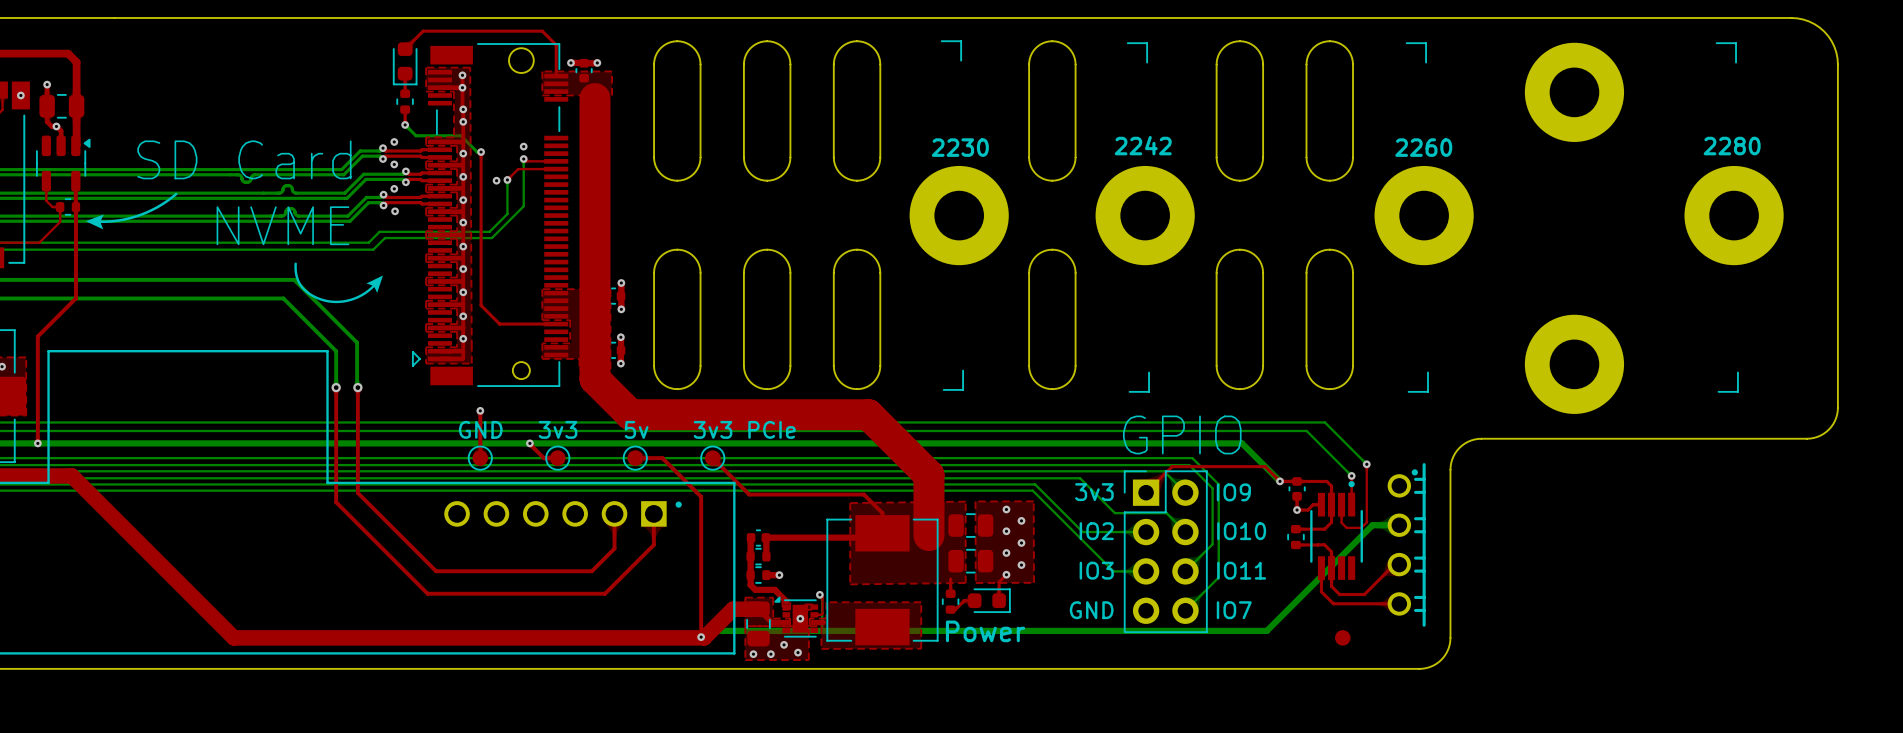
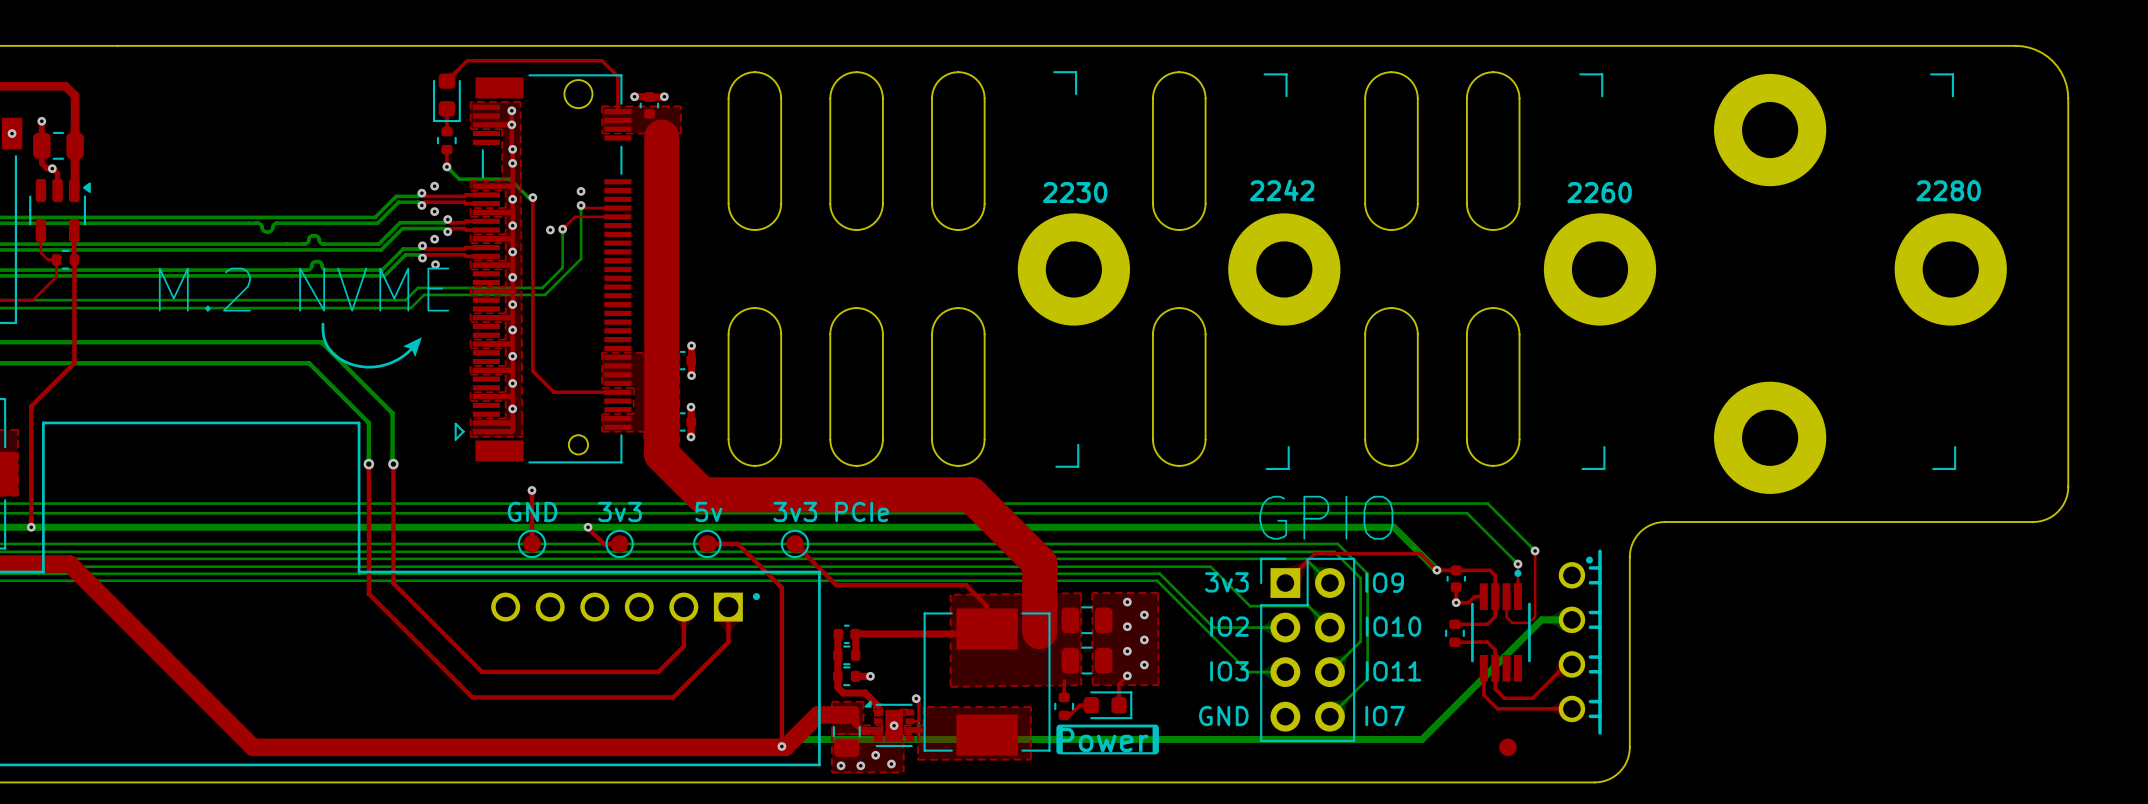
text: SD Card (244, 159) -> none
drawing: [85, 192, 178, 230] -> none
text: NVME (282, 225) -> M.2 NVME (304, 289)
drawing: none -> [1056, 724, 1159, 755]

